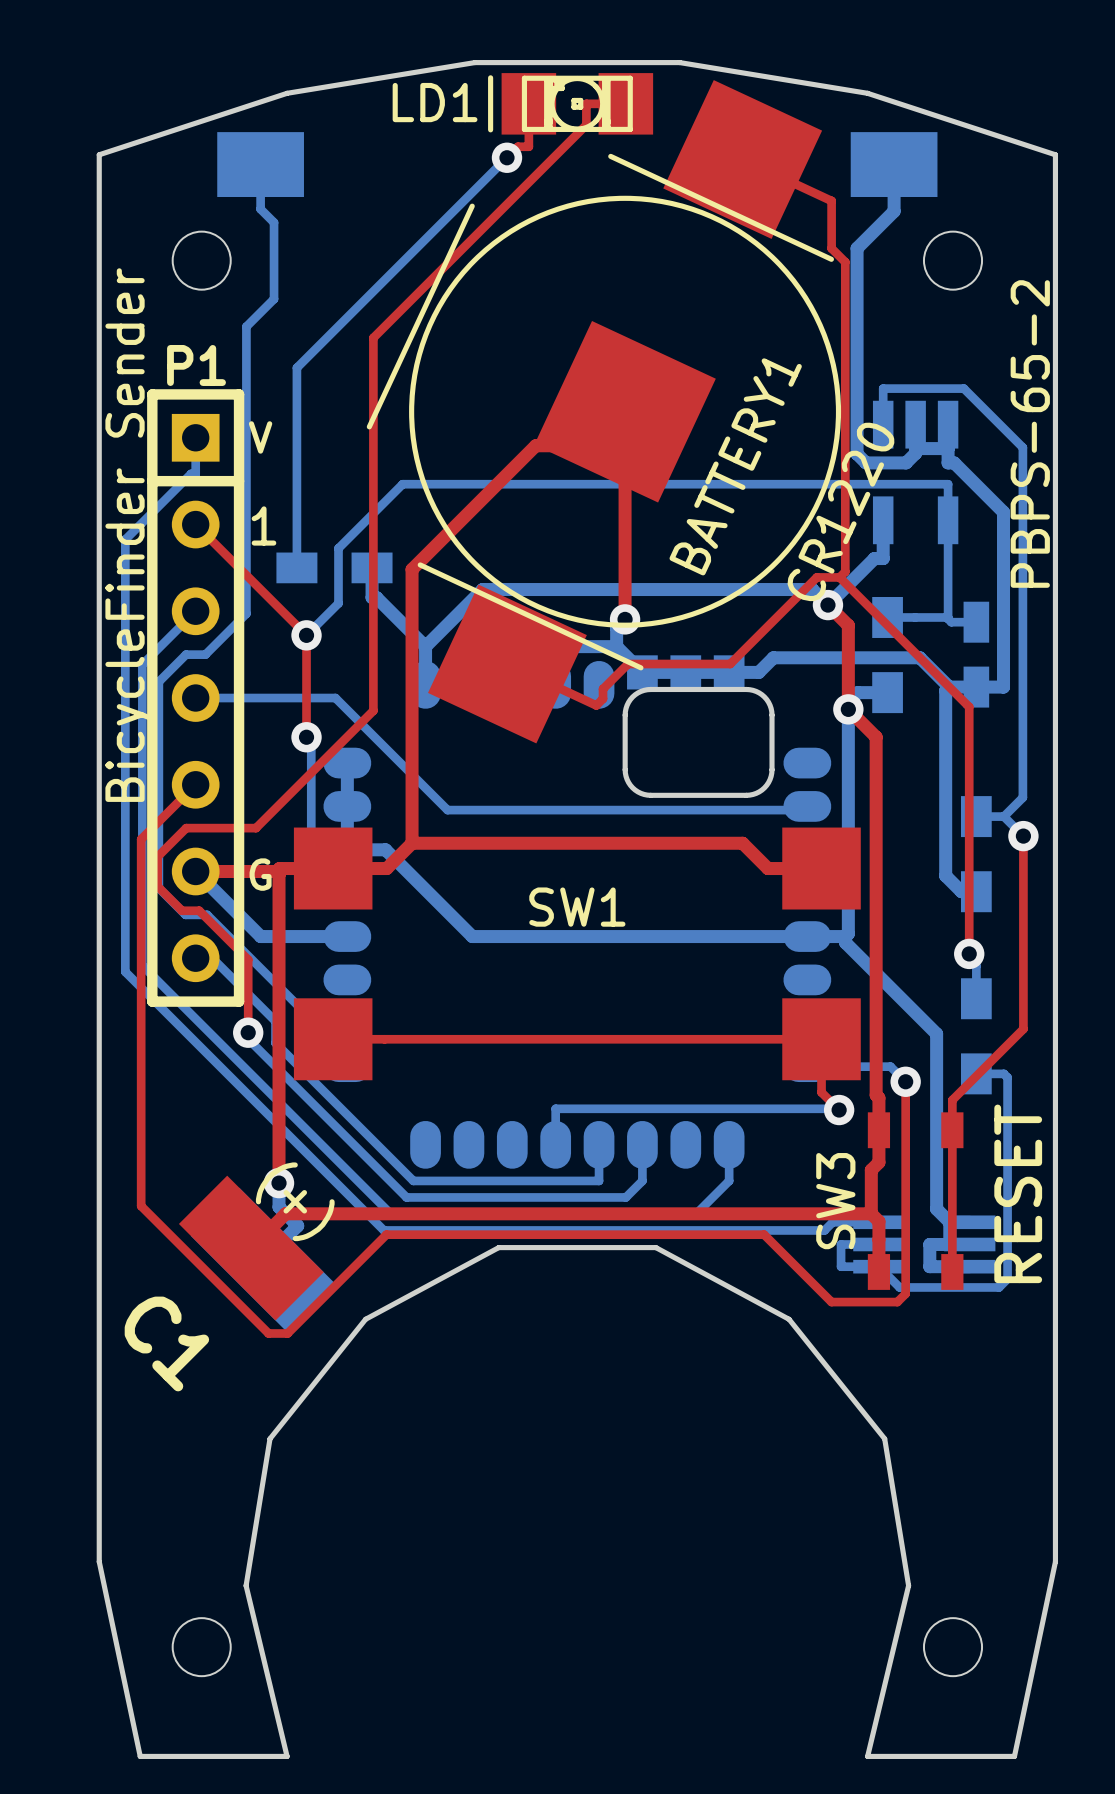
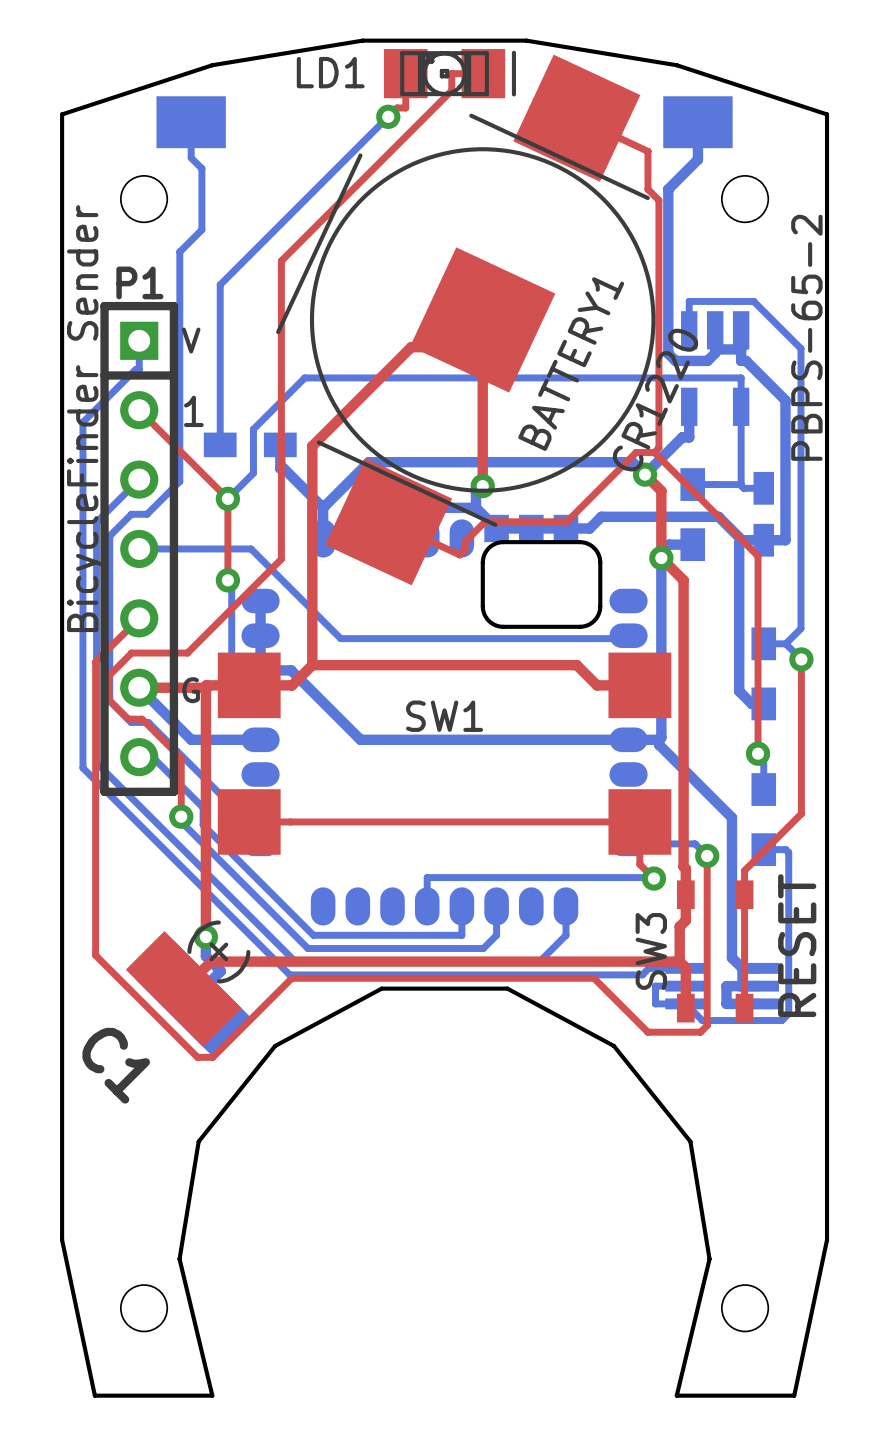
LD1 footprint: [488, 73, 654, 135] -> [383, 49, 516, 99]

